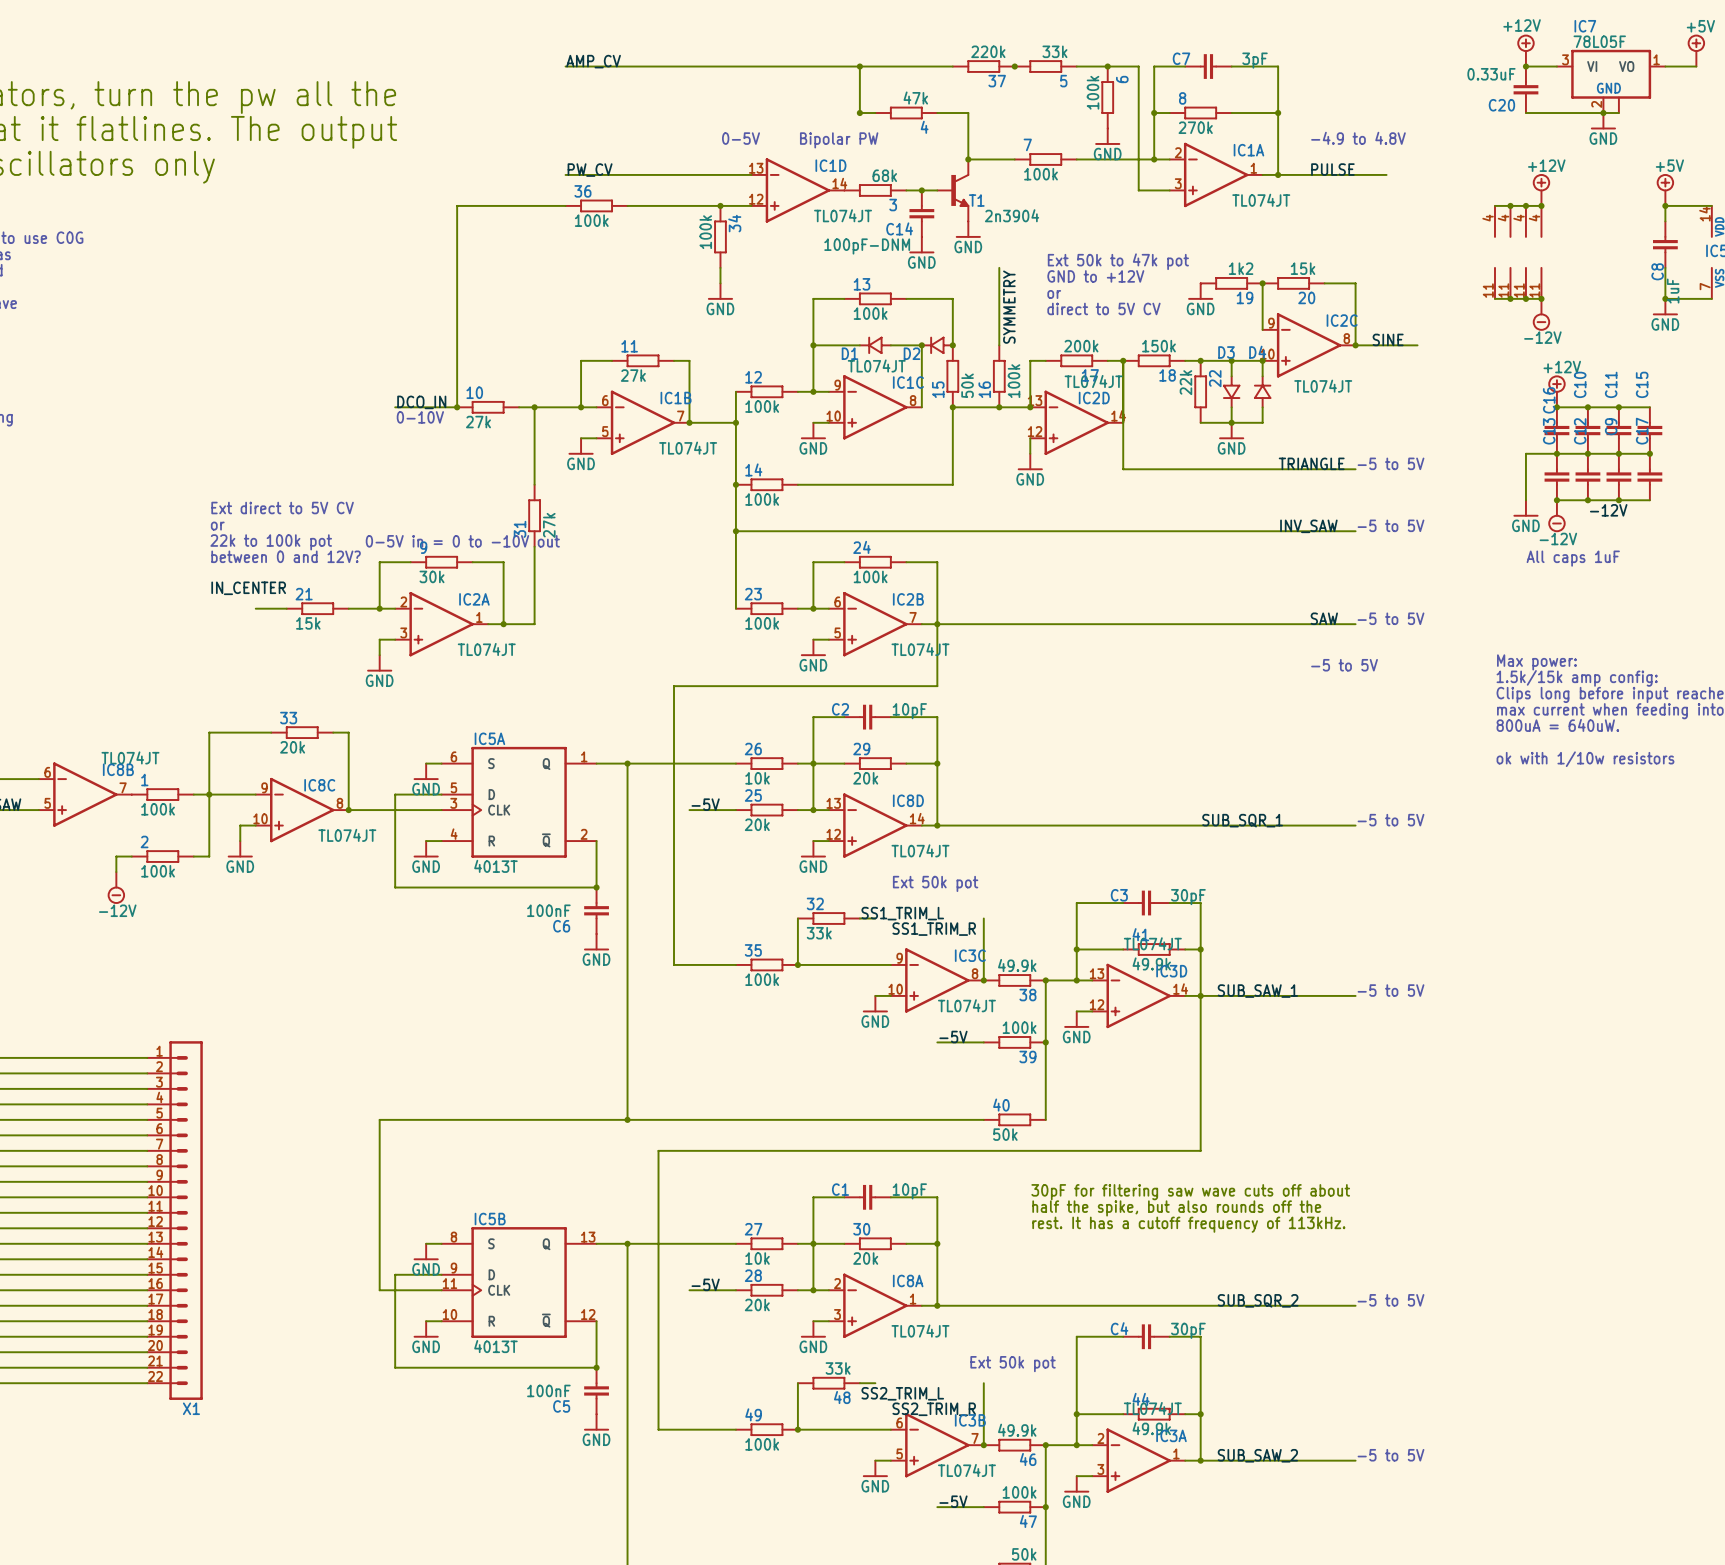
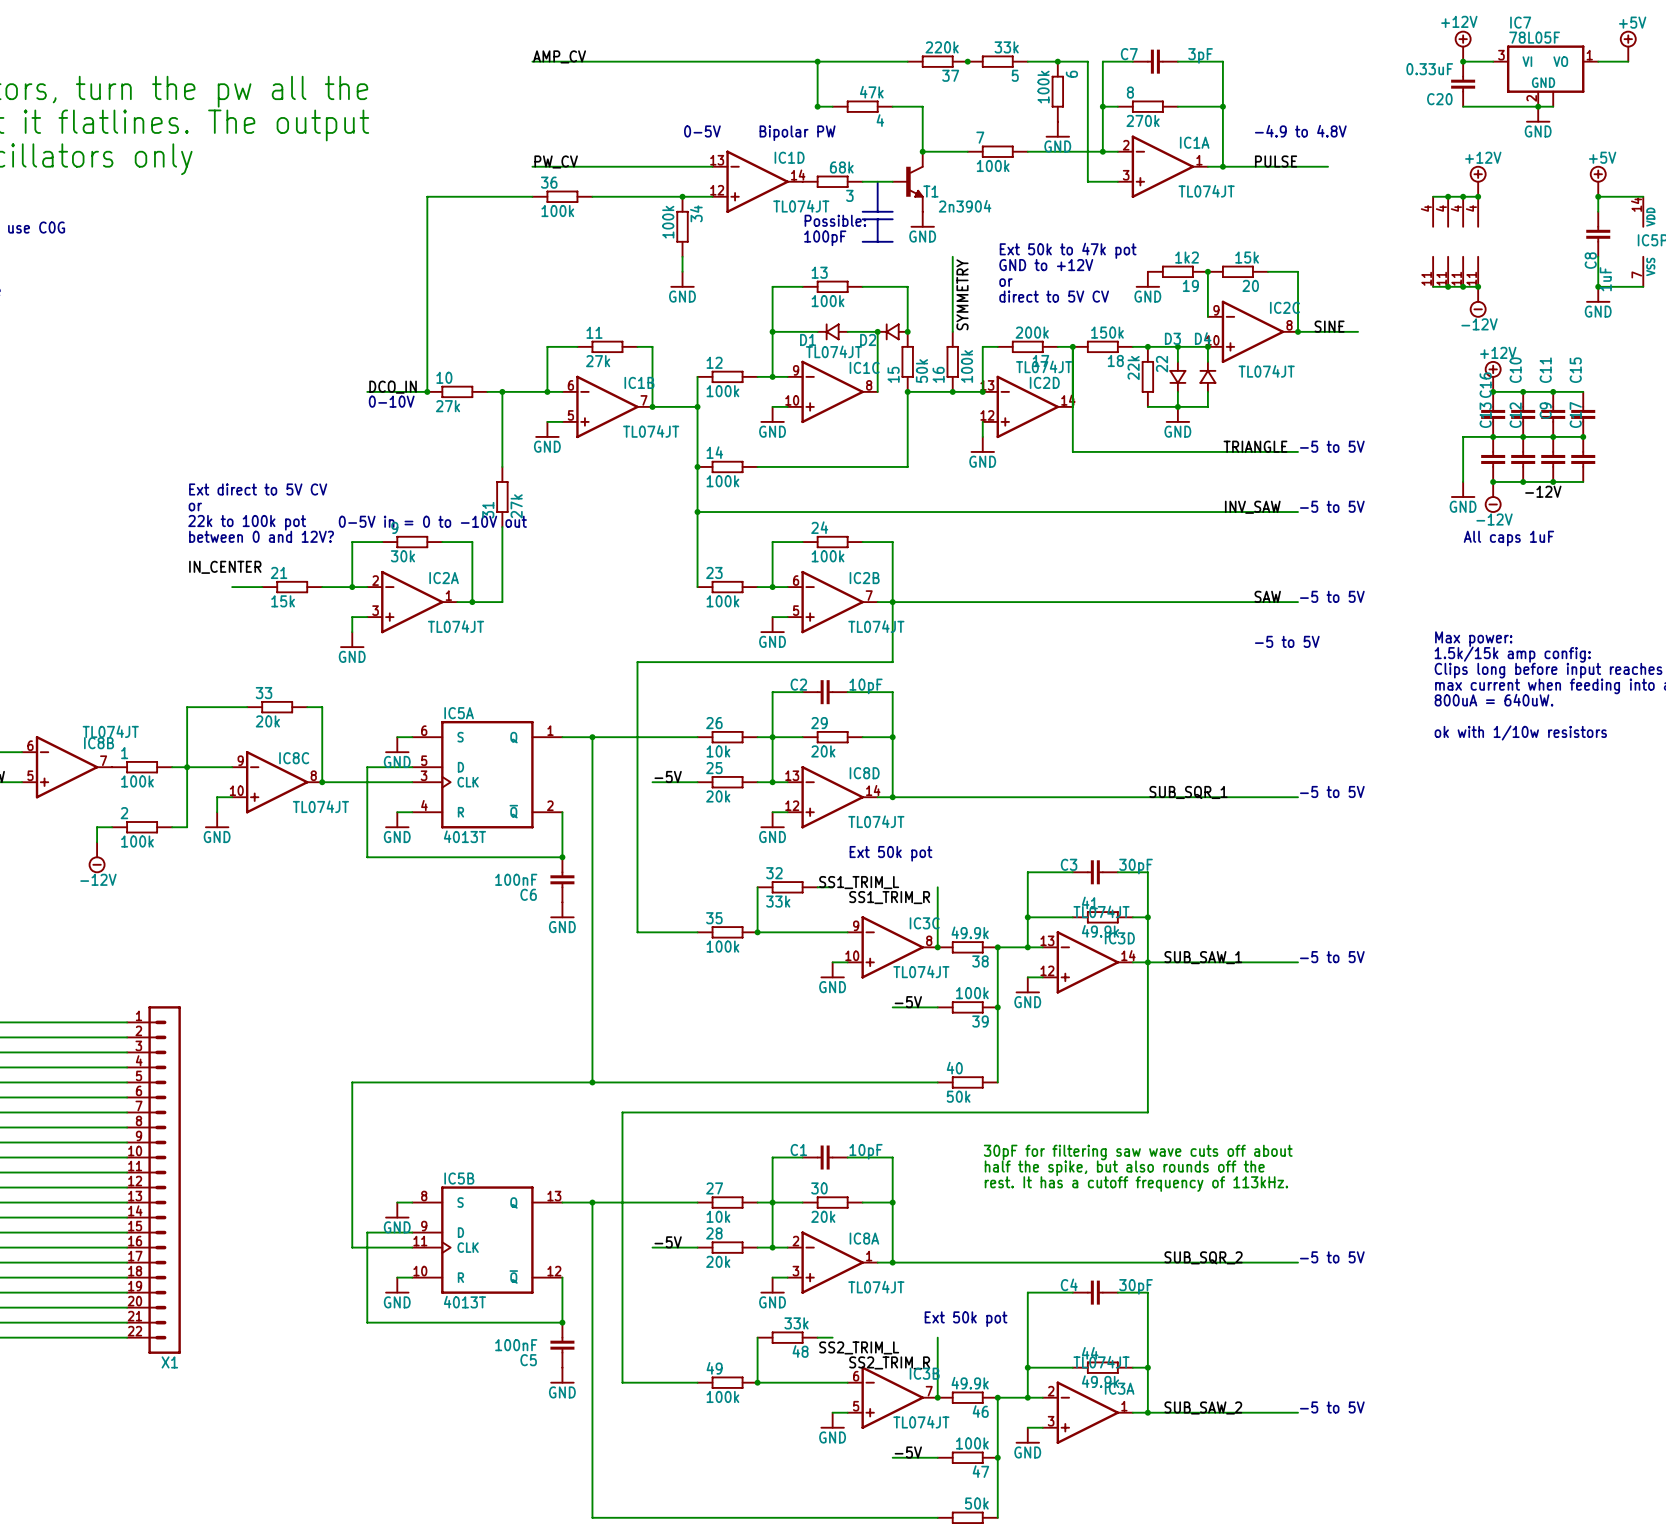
line: none -> (877, 181) (877, 211)
junction: (921, 190) -> none
C14: 100pF-DNM (921, 213) -> none
line: none -> (862, 211) (892, 211)
line: none -> (862, 219) (892, 219)
line: none -> (877, 219) (877, 241)
text: none -> Possible: (835, 220)
power symbol: GND (921, 245) -> none
text: none -> 100pF (825, 238)
line: none -> (862, 241) (892, 241)

